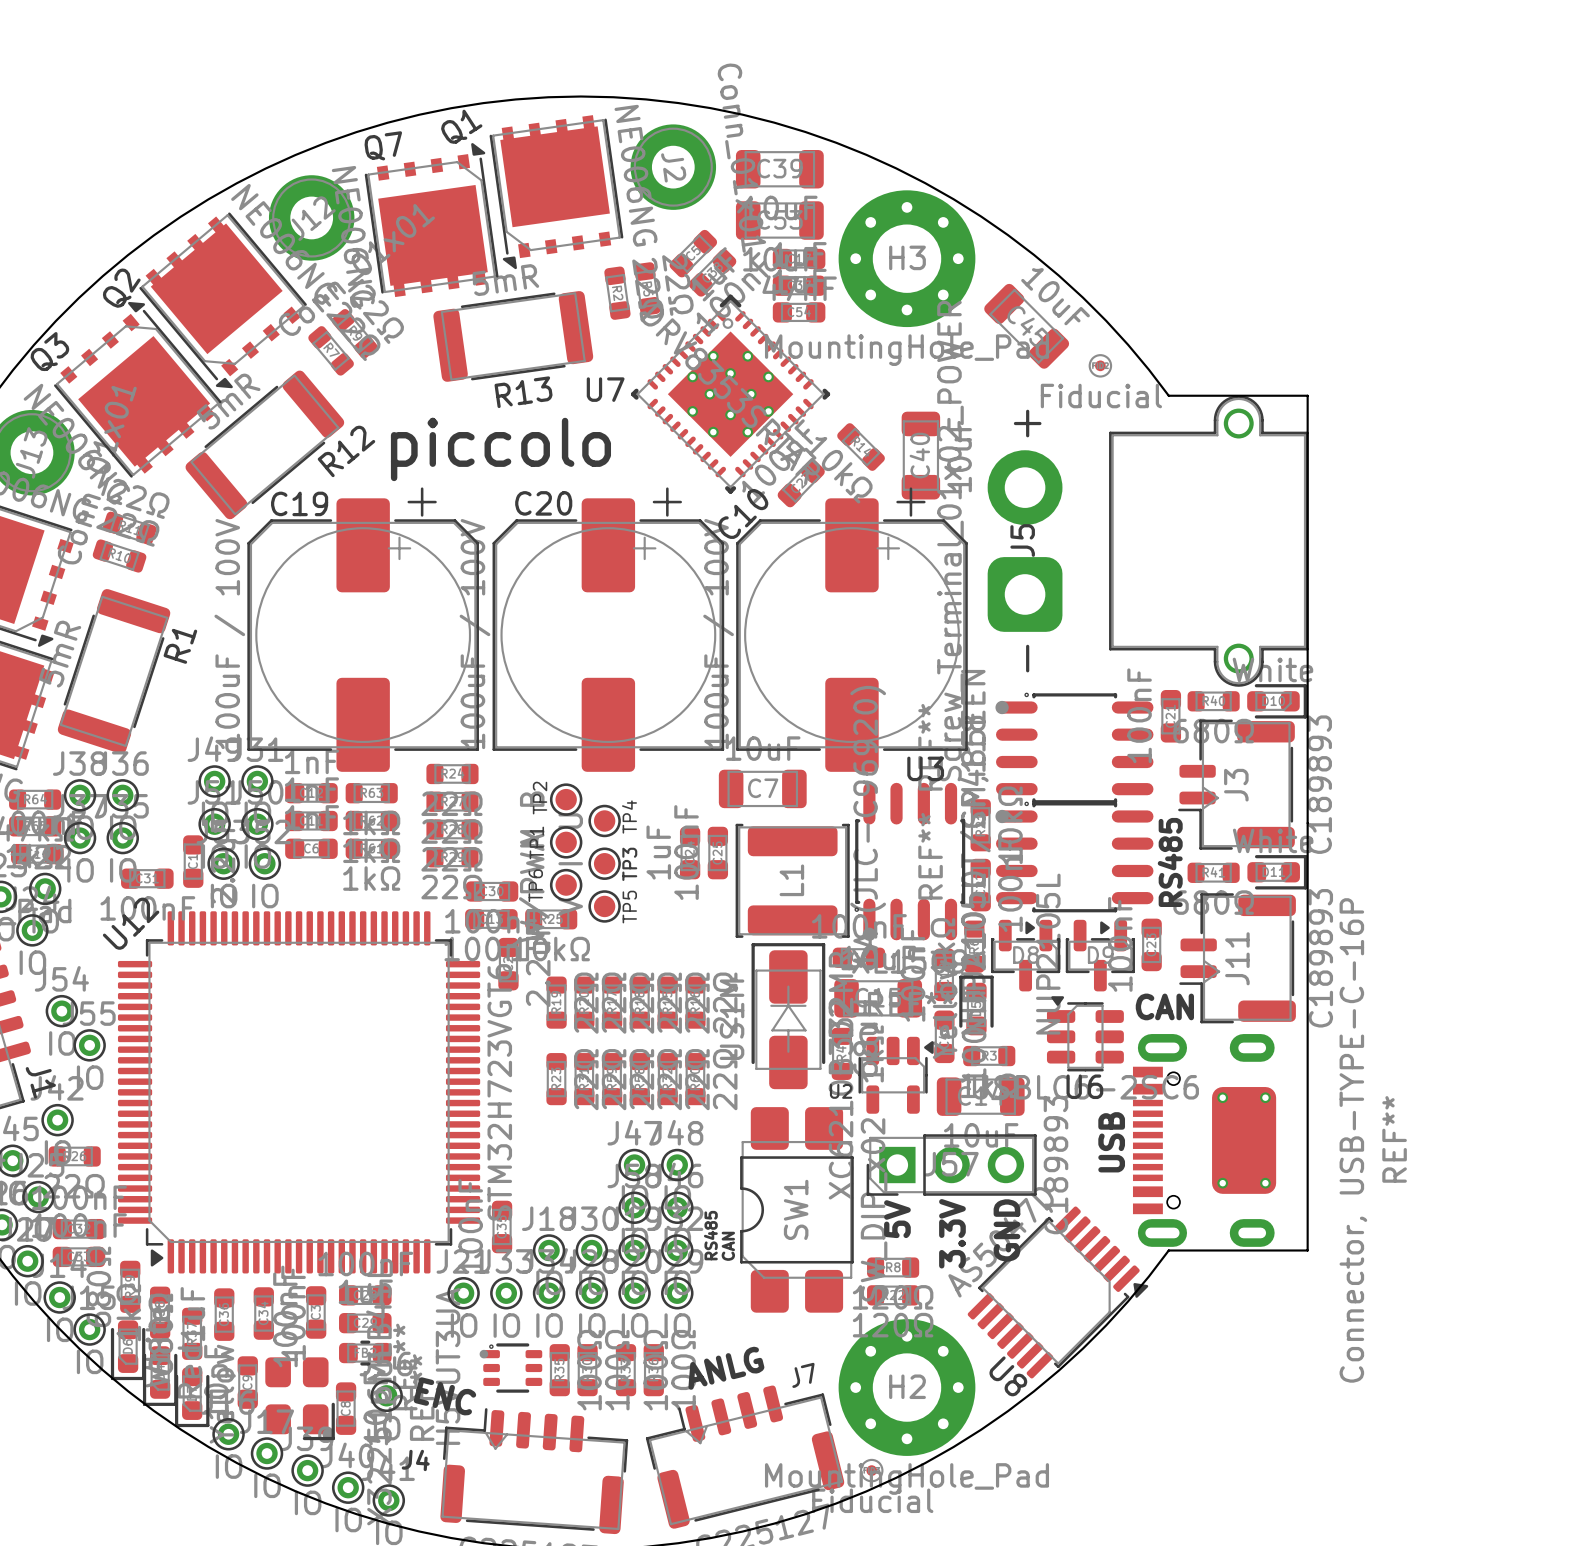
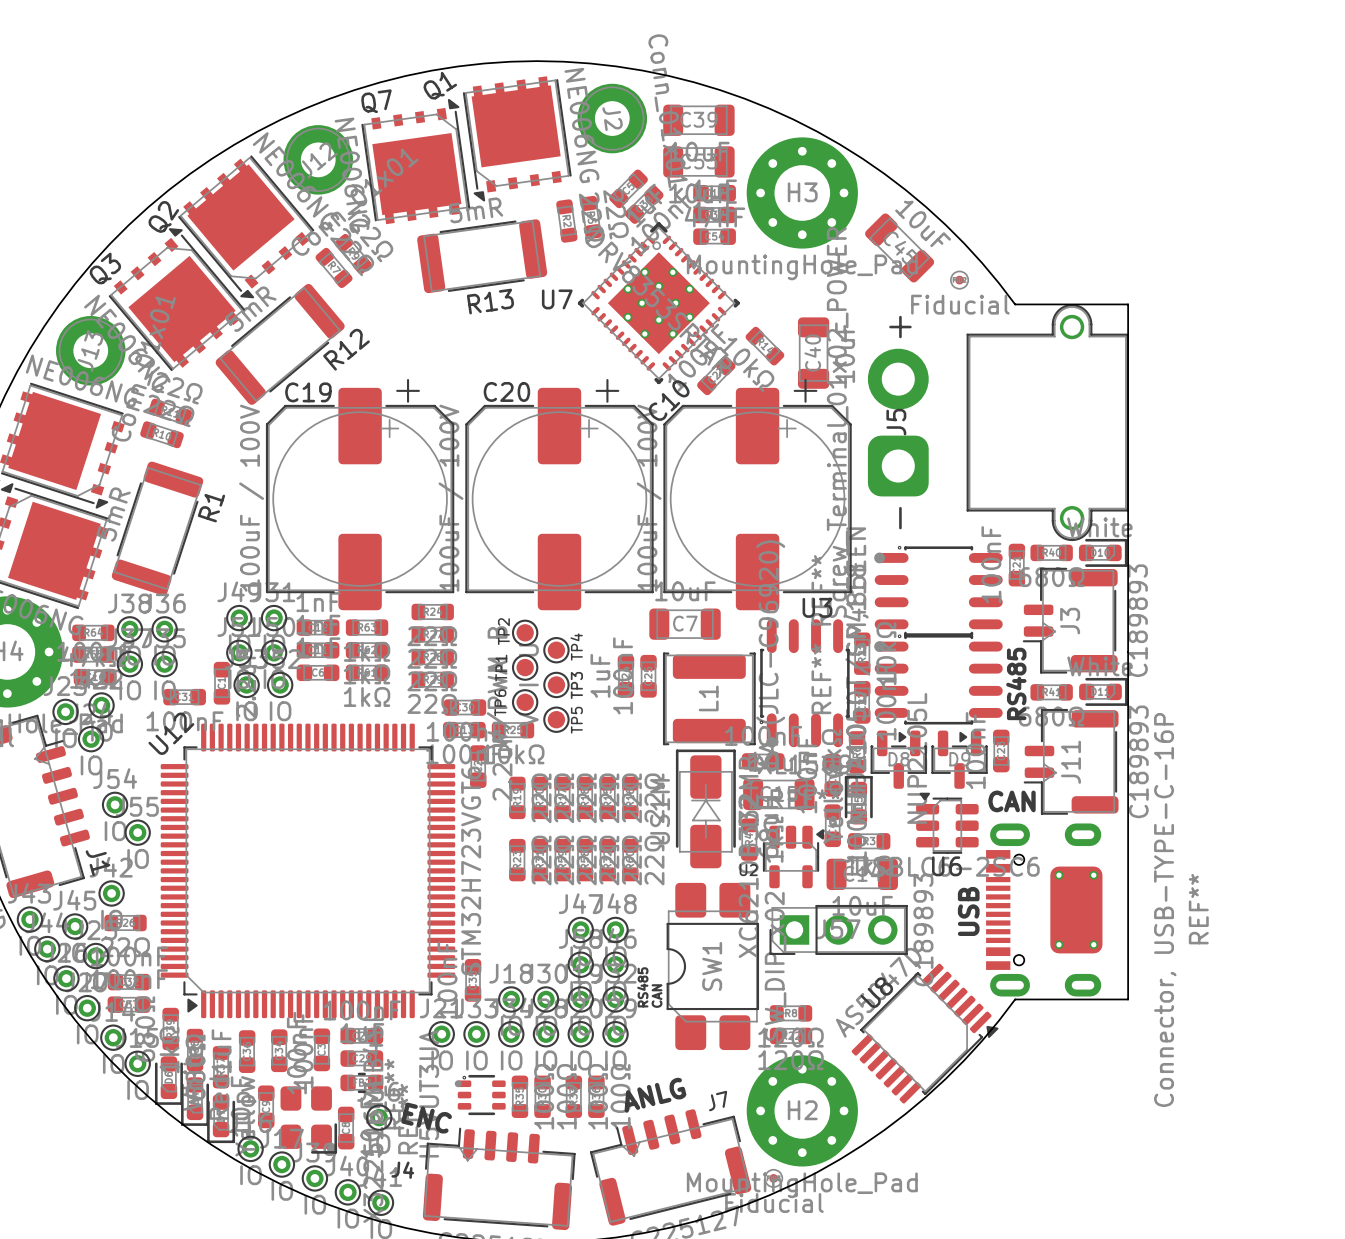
text: piccolo (500, 449) -> none
text: 5V (897, 1219) -> none
text: GND (1006, 1230) -> none
text: 3.3V (952, 1233) -> none
U8 name rotation: 0° (1008, 1376) -> 90° counterclockwise (876, 992)
U8 name position: U8 (1008, 1376) -> U8 (876, 992)

